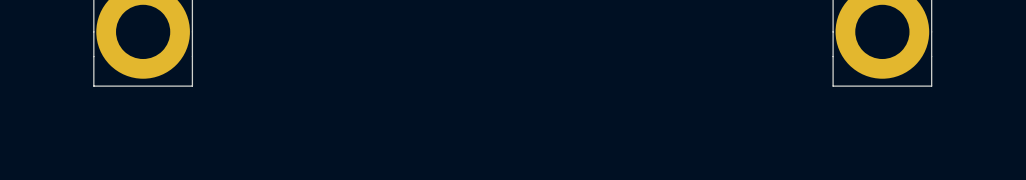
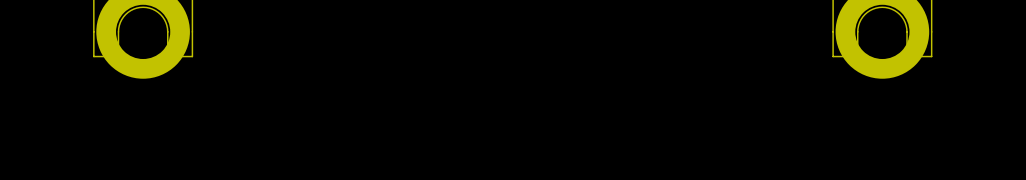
board edge: (192, 56) (192, 86) (93, 86) (93, 56) -> (192, 56) (167, 56) (167, 28) (164, 19) (155, 10) (143, 7) (130, 10) (121, 19) (118, 28) (118, 56) (93, 56)
board edge: (931, 56) (931, 86) (833, 86) (833, 56) -> (931, 56) (907, 56) (906, 28) (903, 19) (894, 10) (882, 7) (870, 10) (861, 19) (857, 28) (857, 56) (833, 56)

